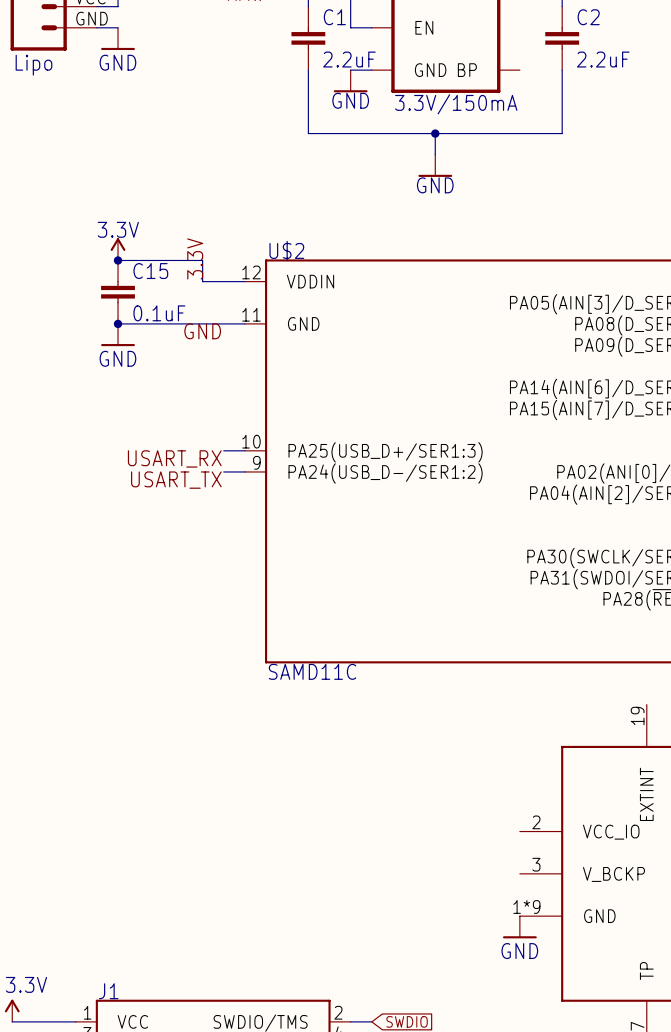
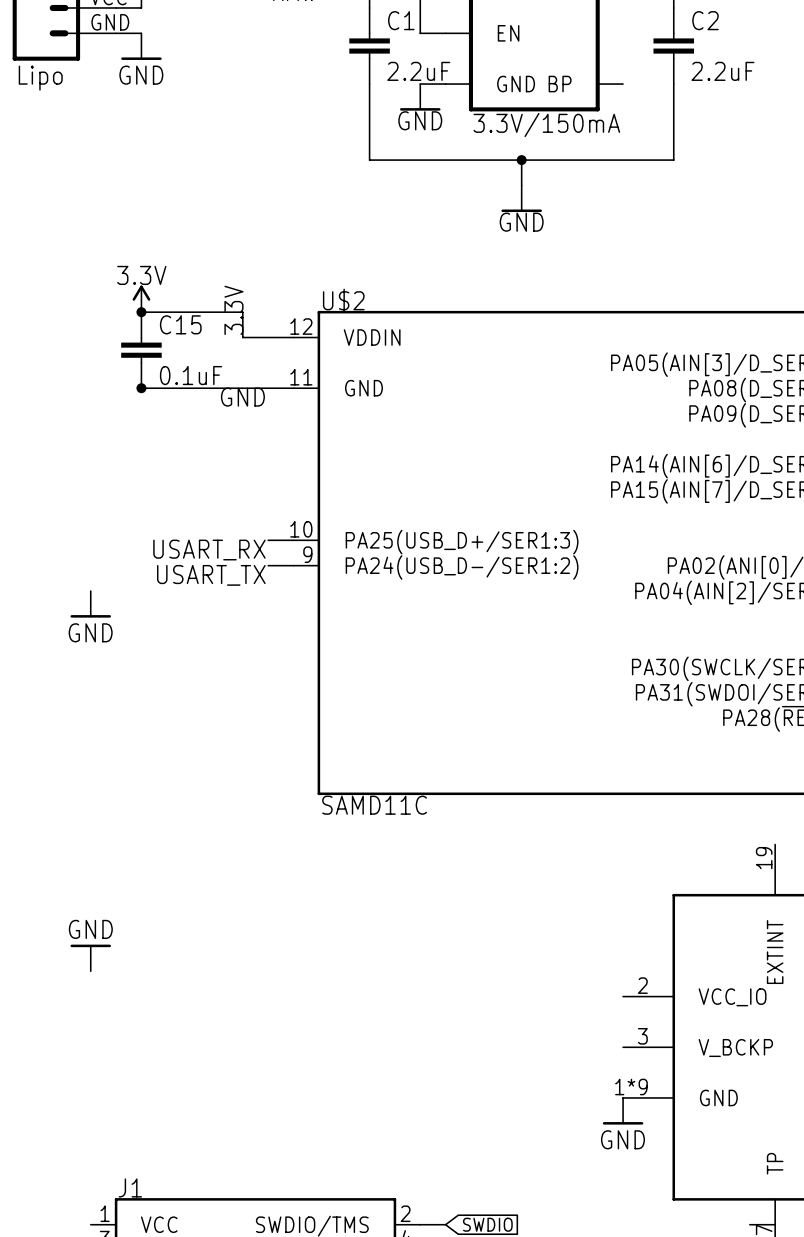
power symbol position: GND (118, 335) -> GND (90, 604)
power symbol: none -> GND (90, 957)
power symbol: 3.3V (12, 1010) -> none
wire: (12, 1021) (75, 1021) -> none
wire: none -> (749, 1224) (775, 1224)

